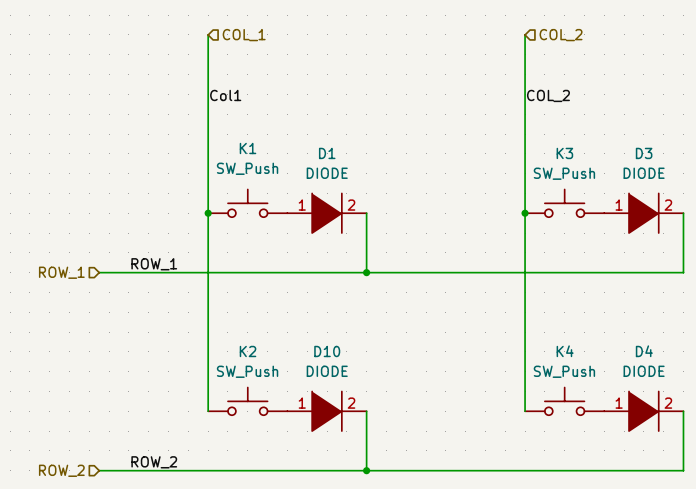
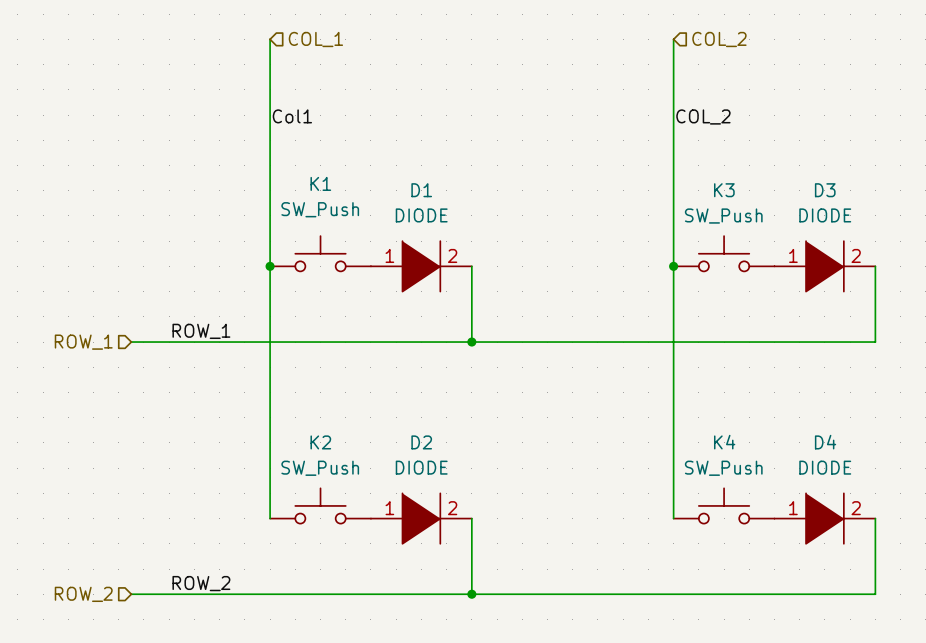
D10 name: D10 (327, 351) -> D2 (421, 442)

